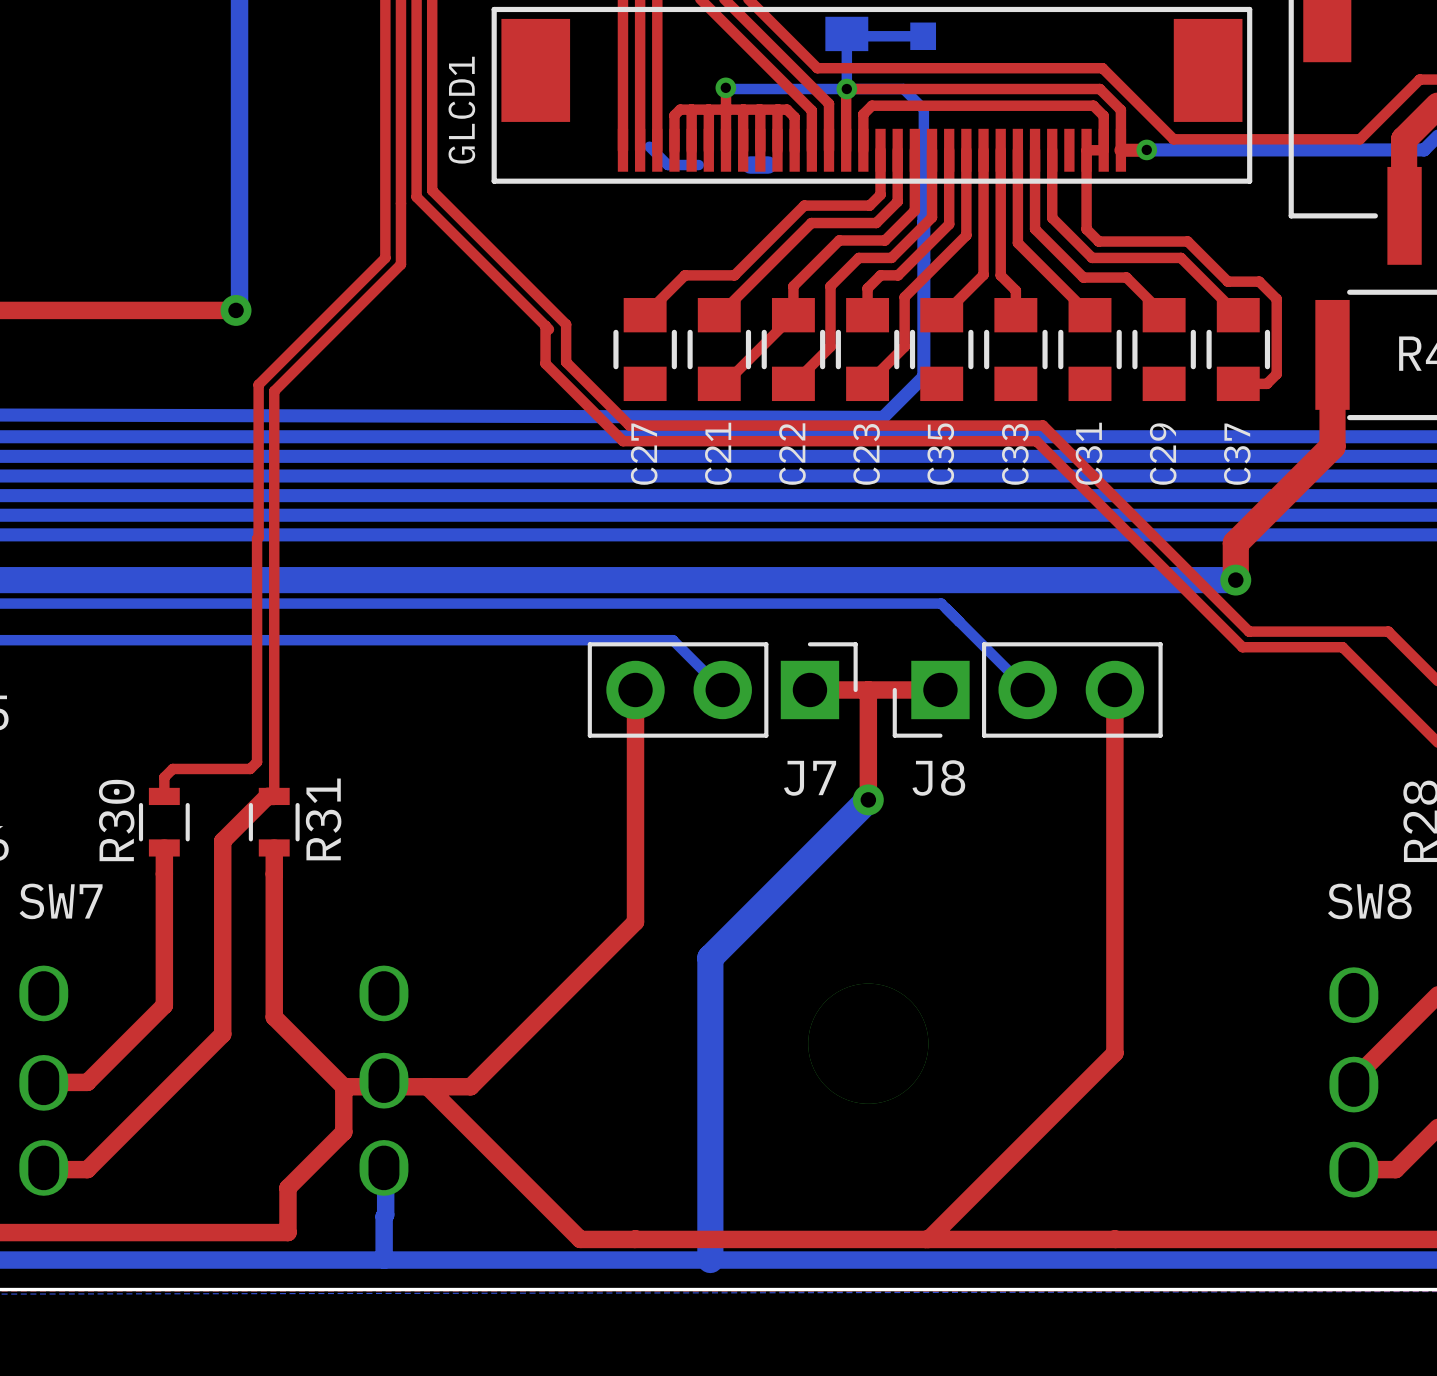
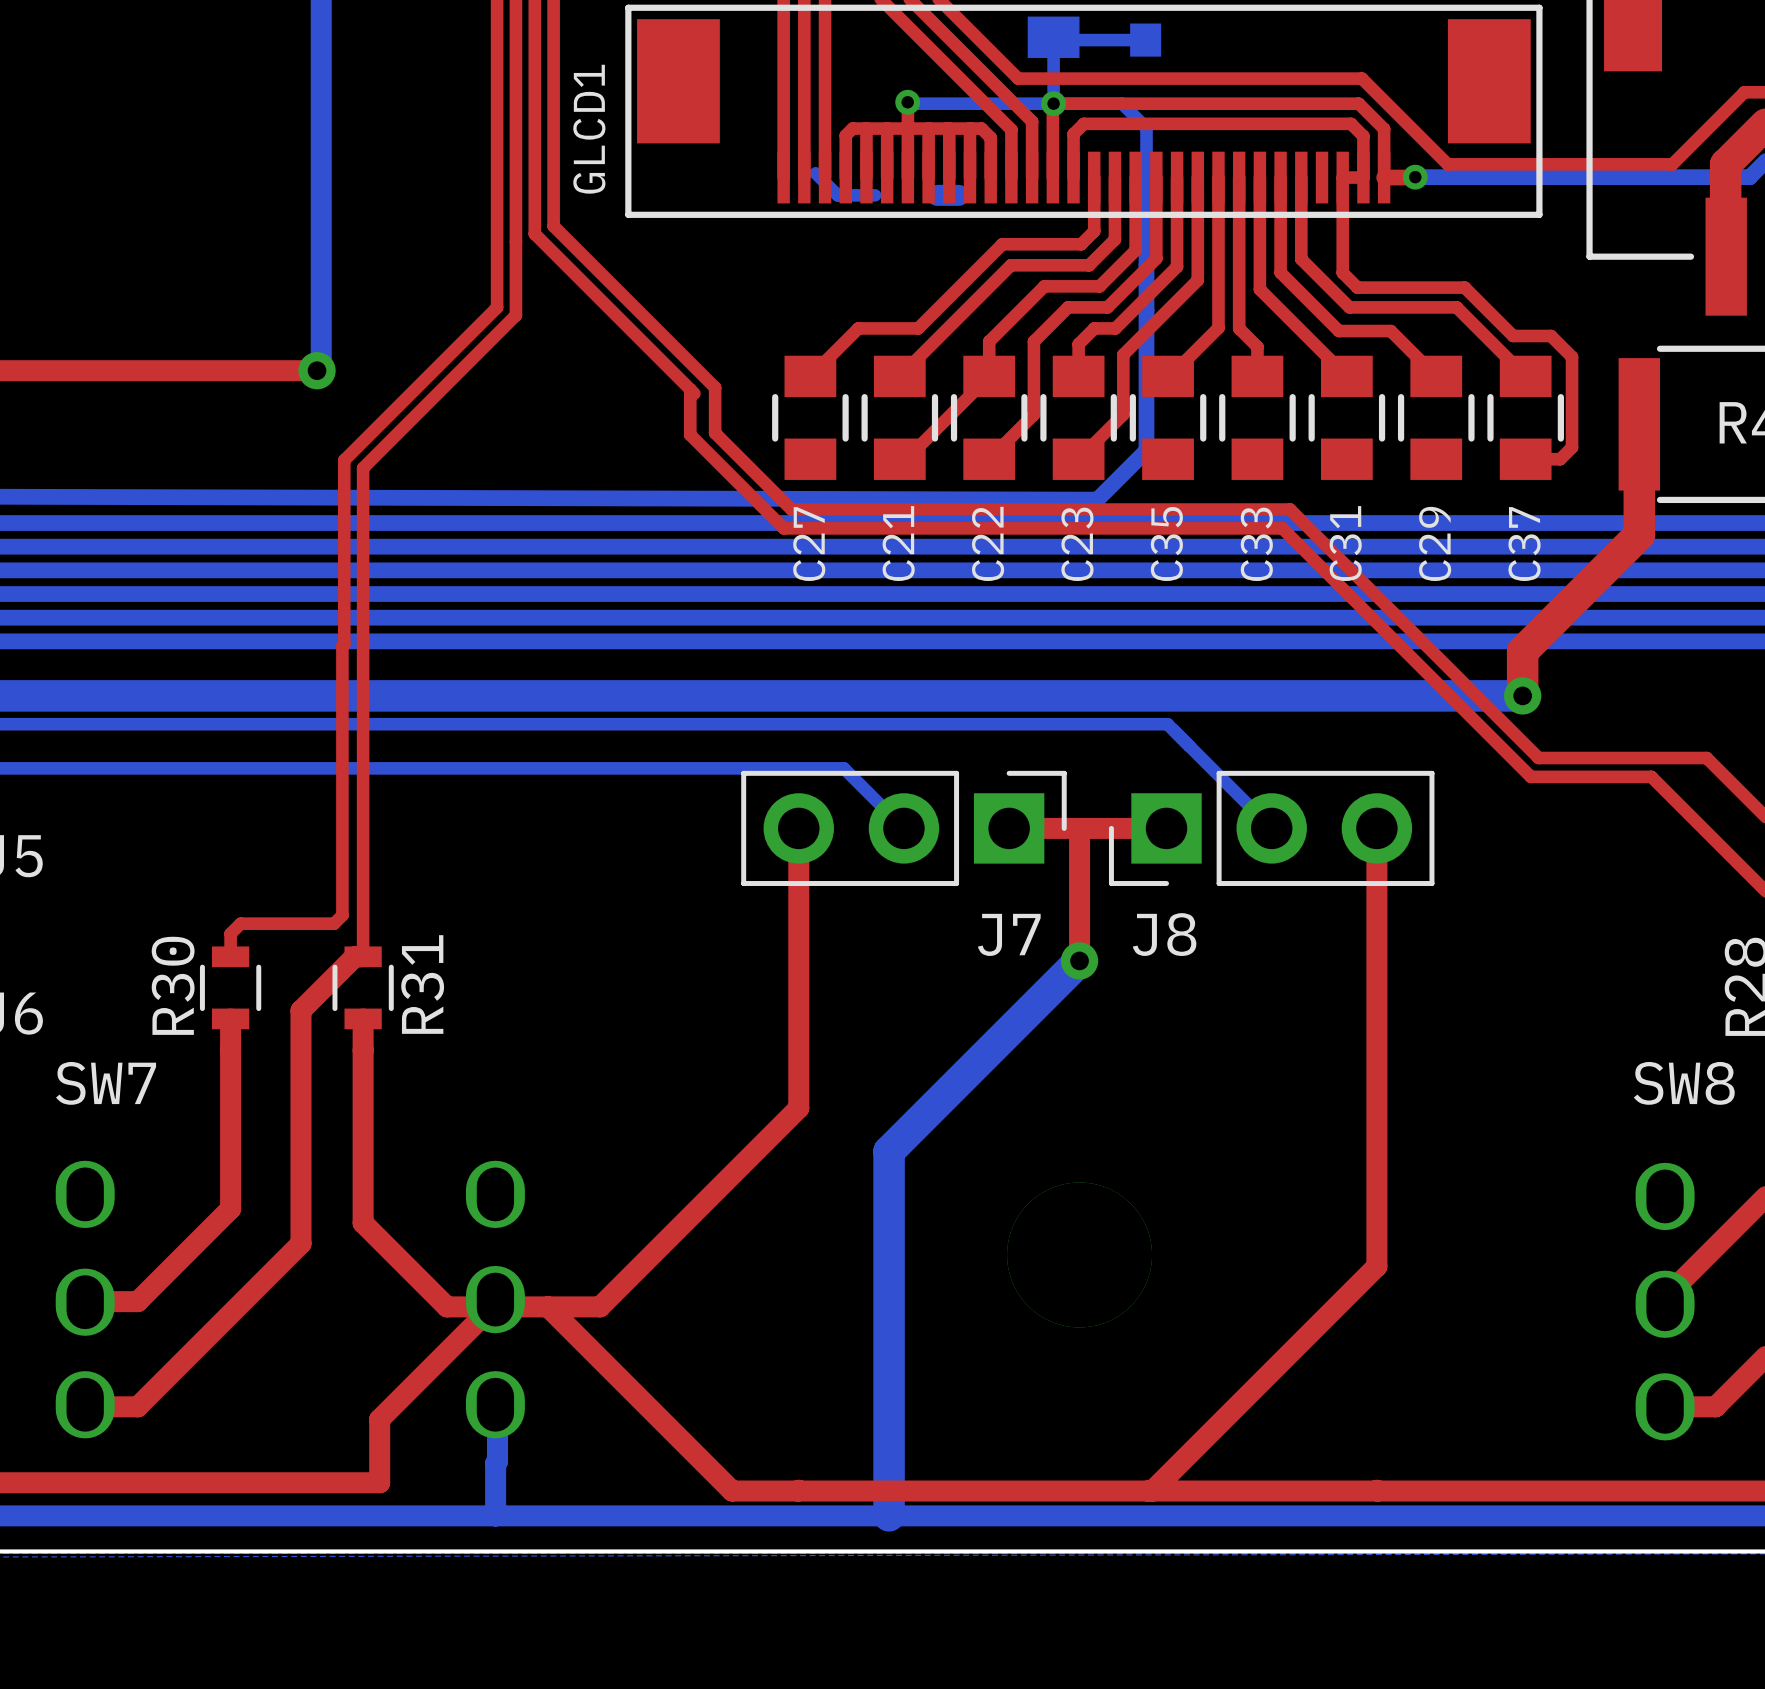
top track: (343, 1086) (343, 1132) (287, 1187) -> (495, 1299) (495, 1303) (379, 1419) (379, 1428)

